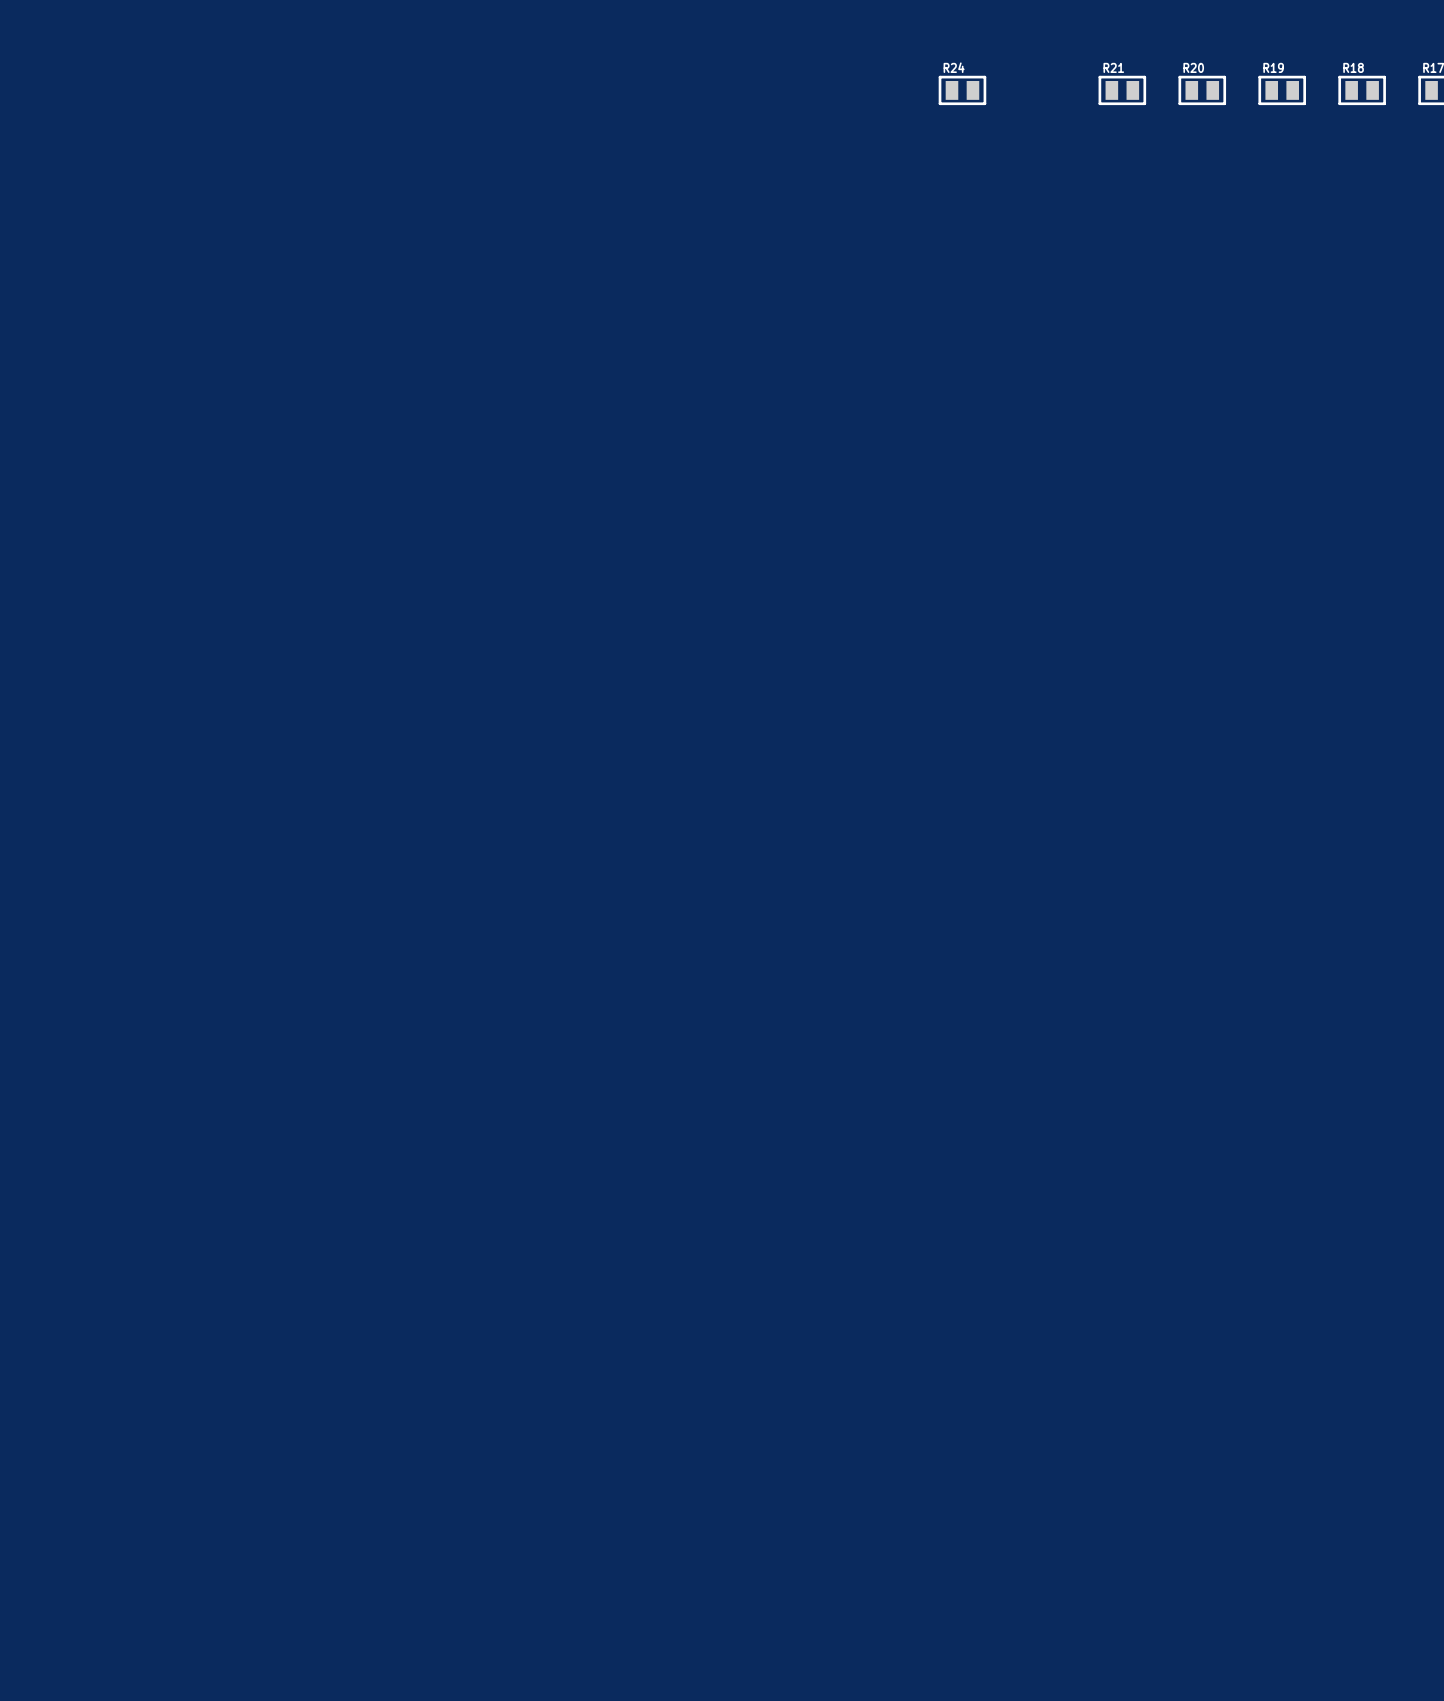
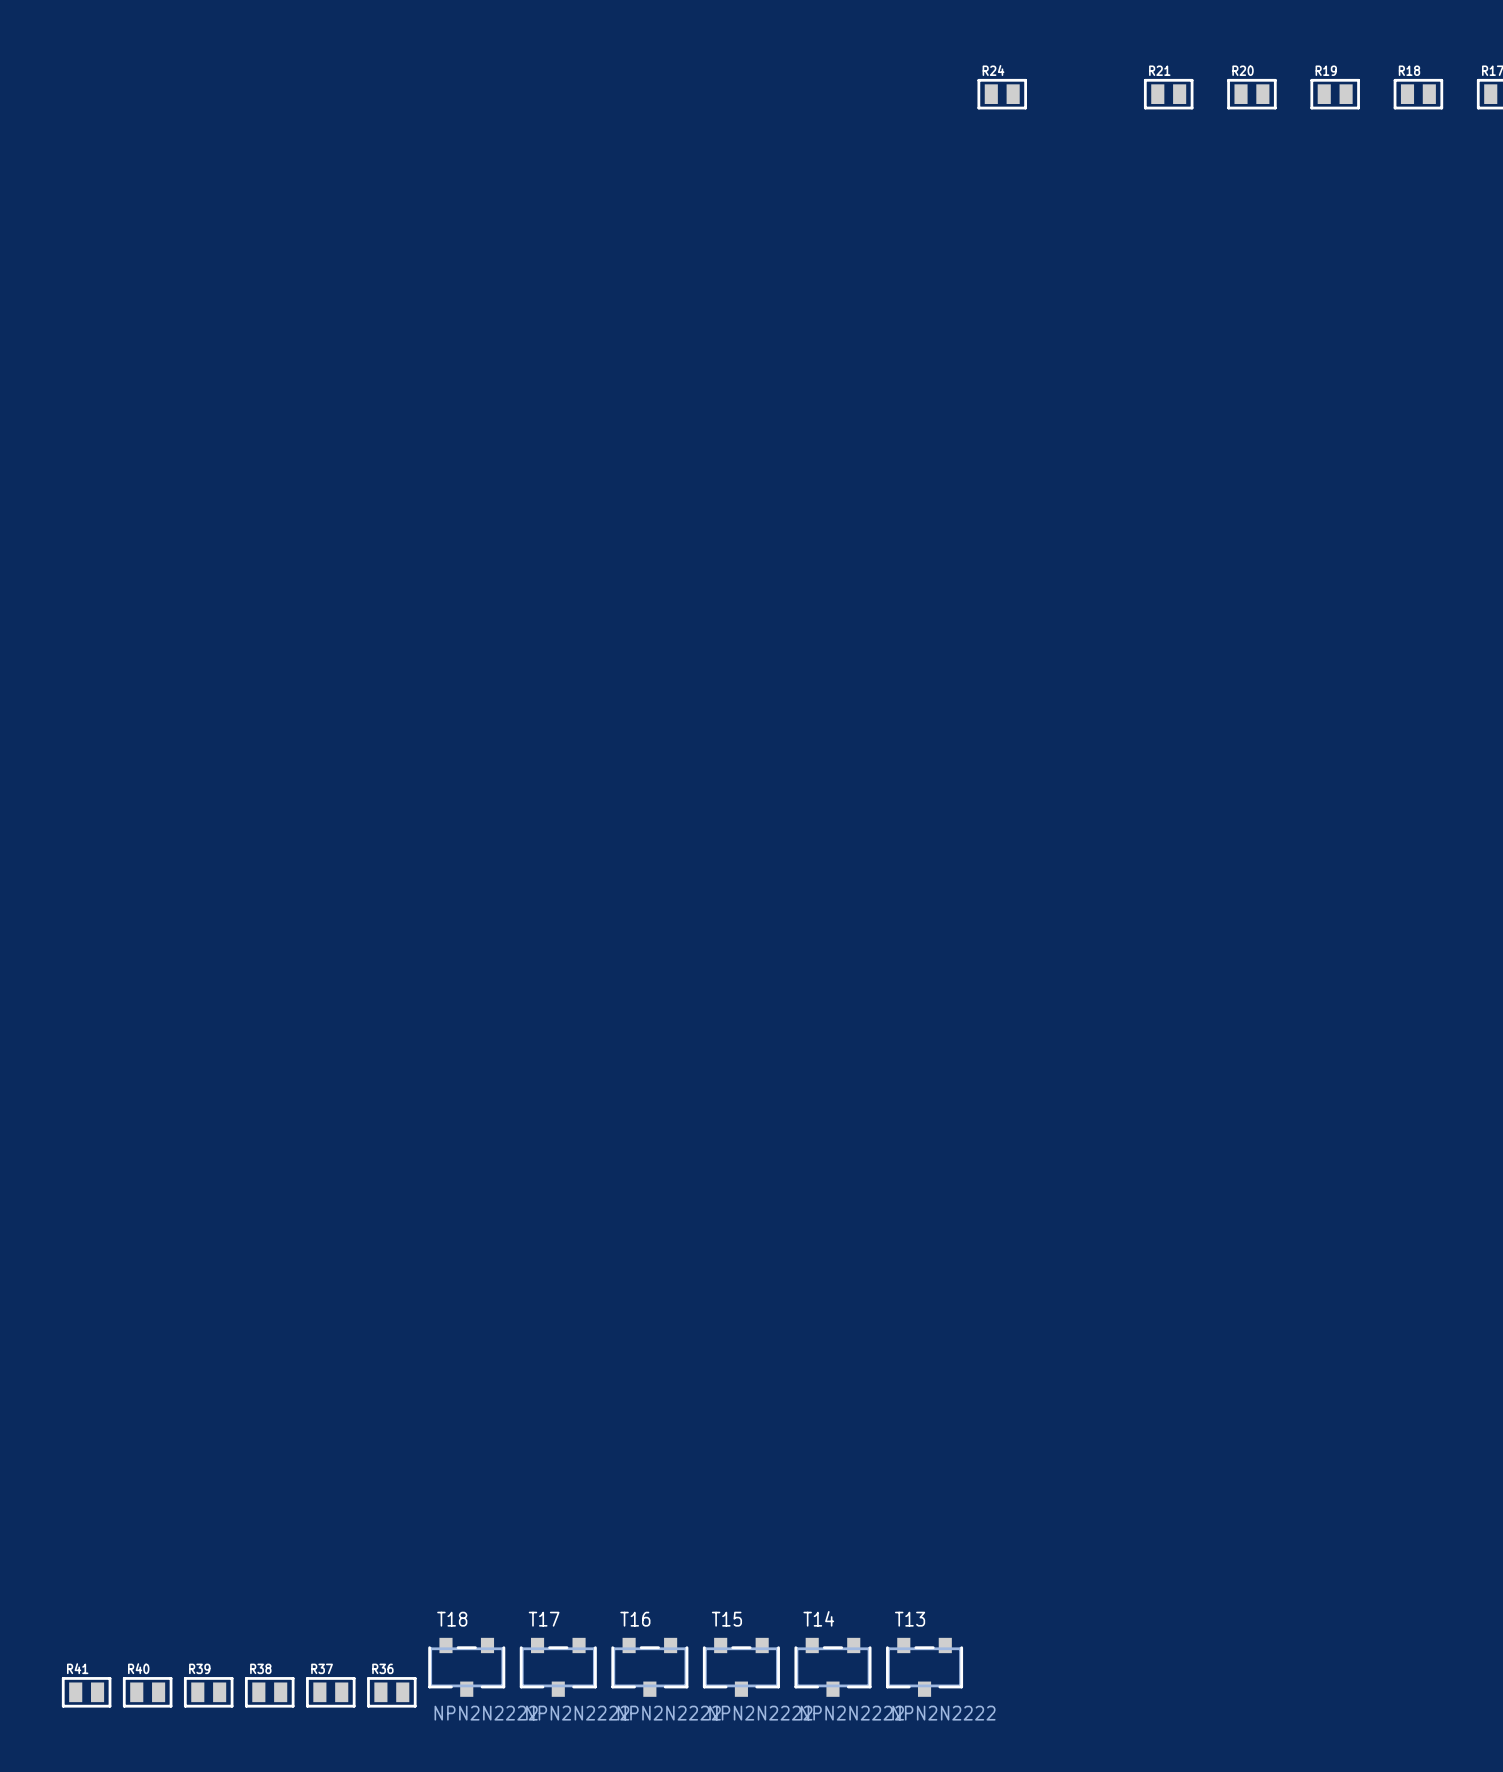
T18: none -> NPN2N2222 (466, 1667)
T17: none -> NPN2N2222 (558, 1667)
T16: none -> NPN2N2222 (649, 1667)
T15: none -> NPN2N2222 (741, 1667)
T14: none -> NPN2N2222 (832, 1667)
T13: none -> NPN2N2222 (924, 1667)
R41: none -> (86, 1692)
R40: none -> (147, 1692)
R39: none -> (208, 1692)
R38: none -> (269, 1692)
R37: none -> (330, 1692)
R36: none -> (391, 1692)

